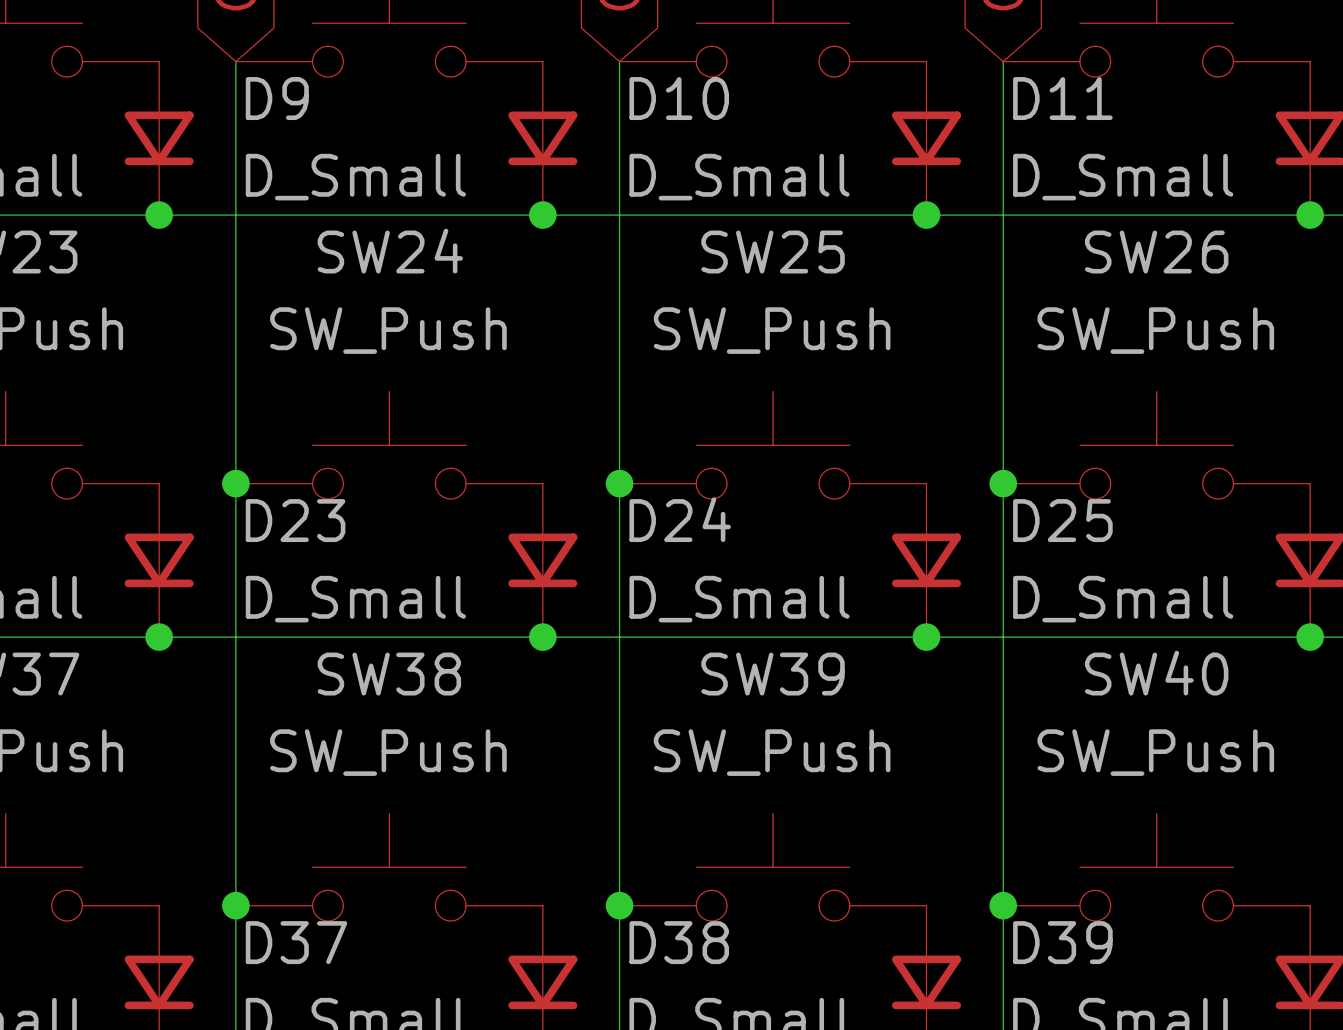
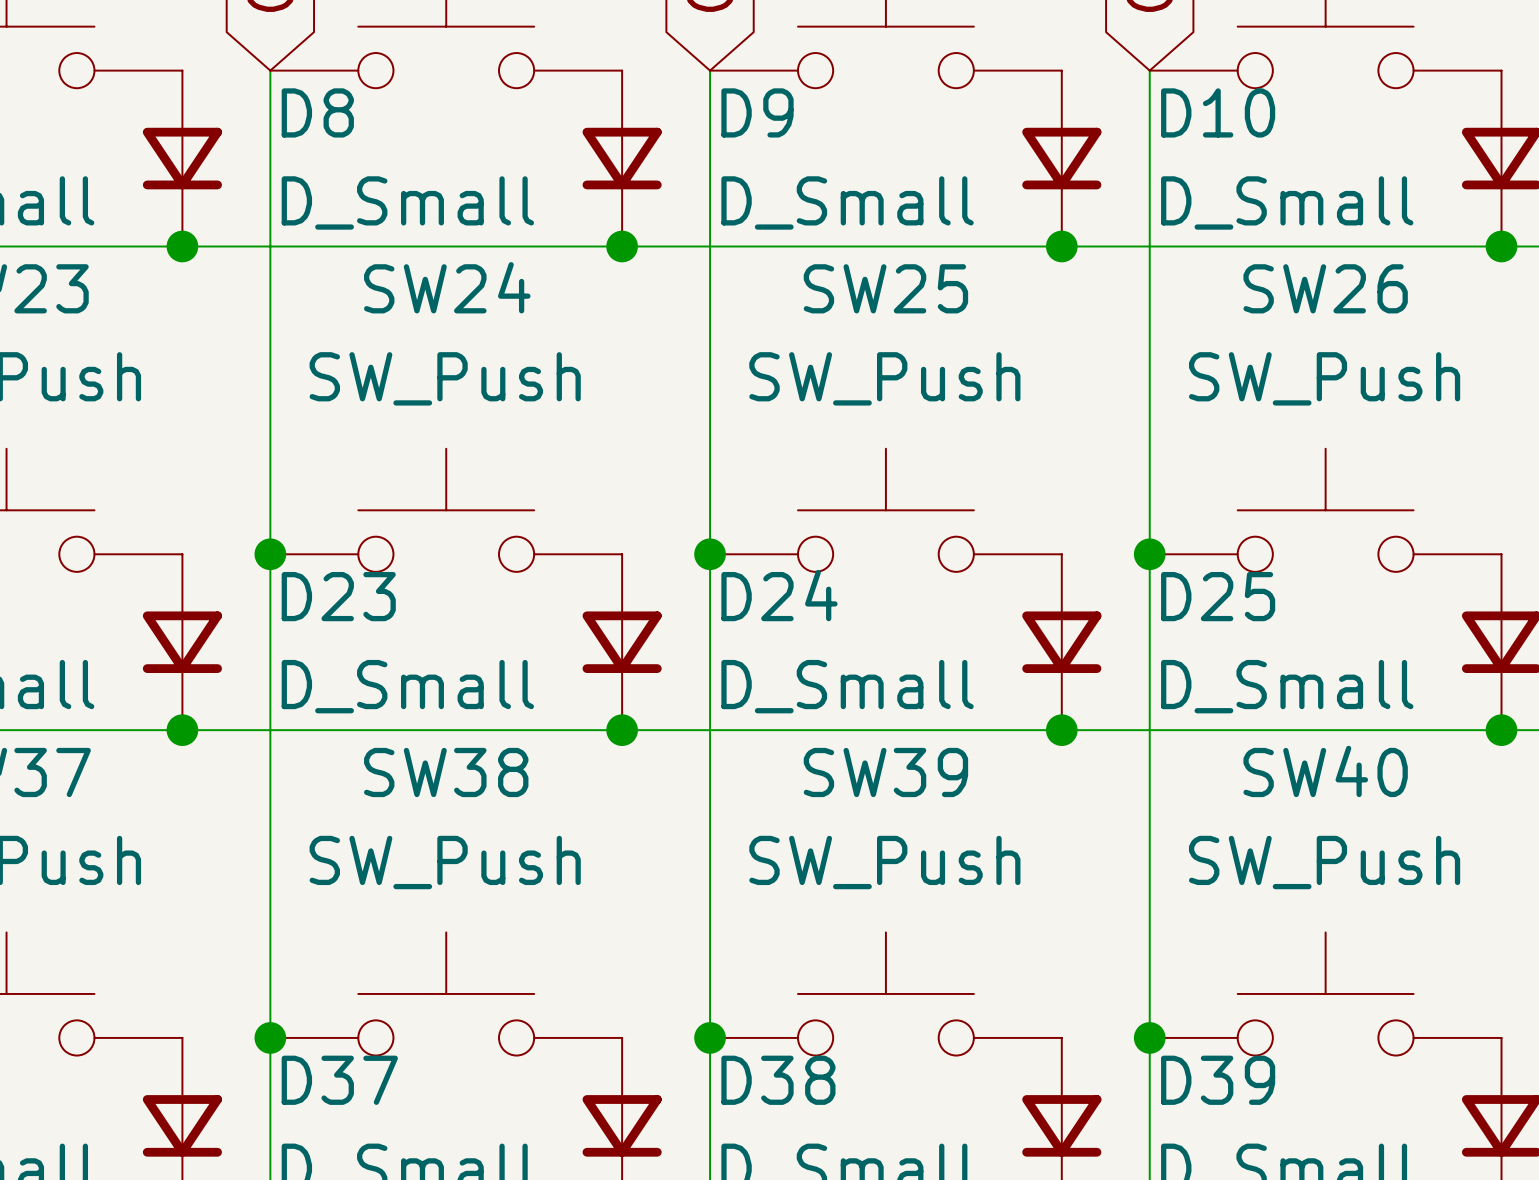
D9 name: D9 (277, 98) -> D8 (317, 112)
D10 name: D10 (679, 98) -> D9 (757, 112)
D11 name: D11 (1062, 98) -> D10 (1218, 112)

